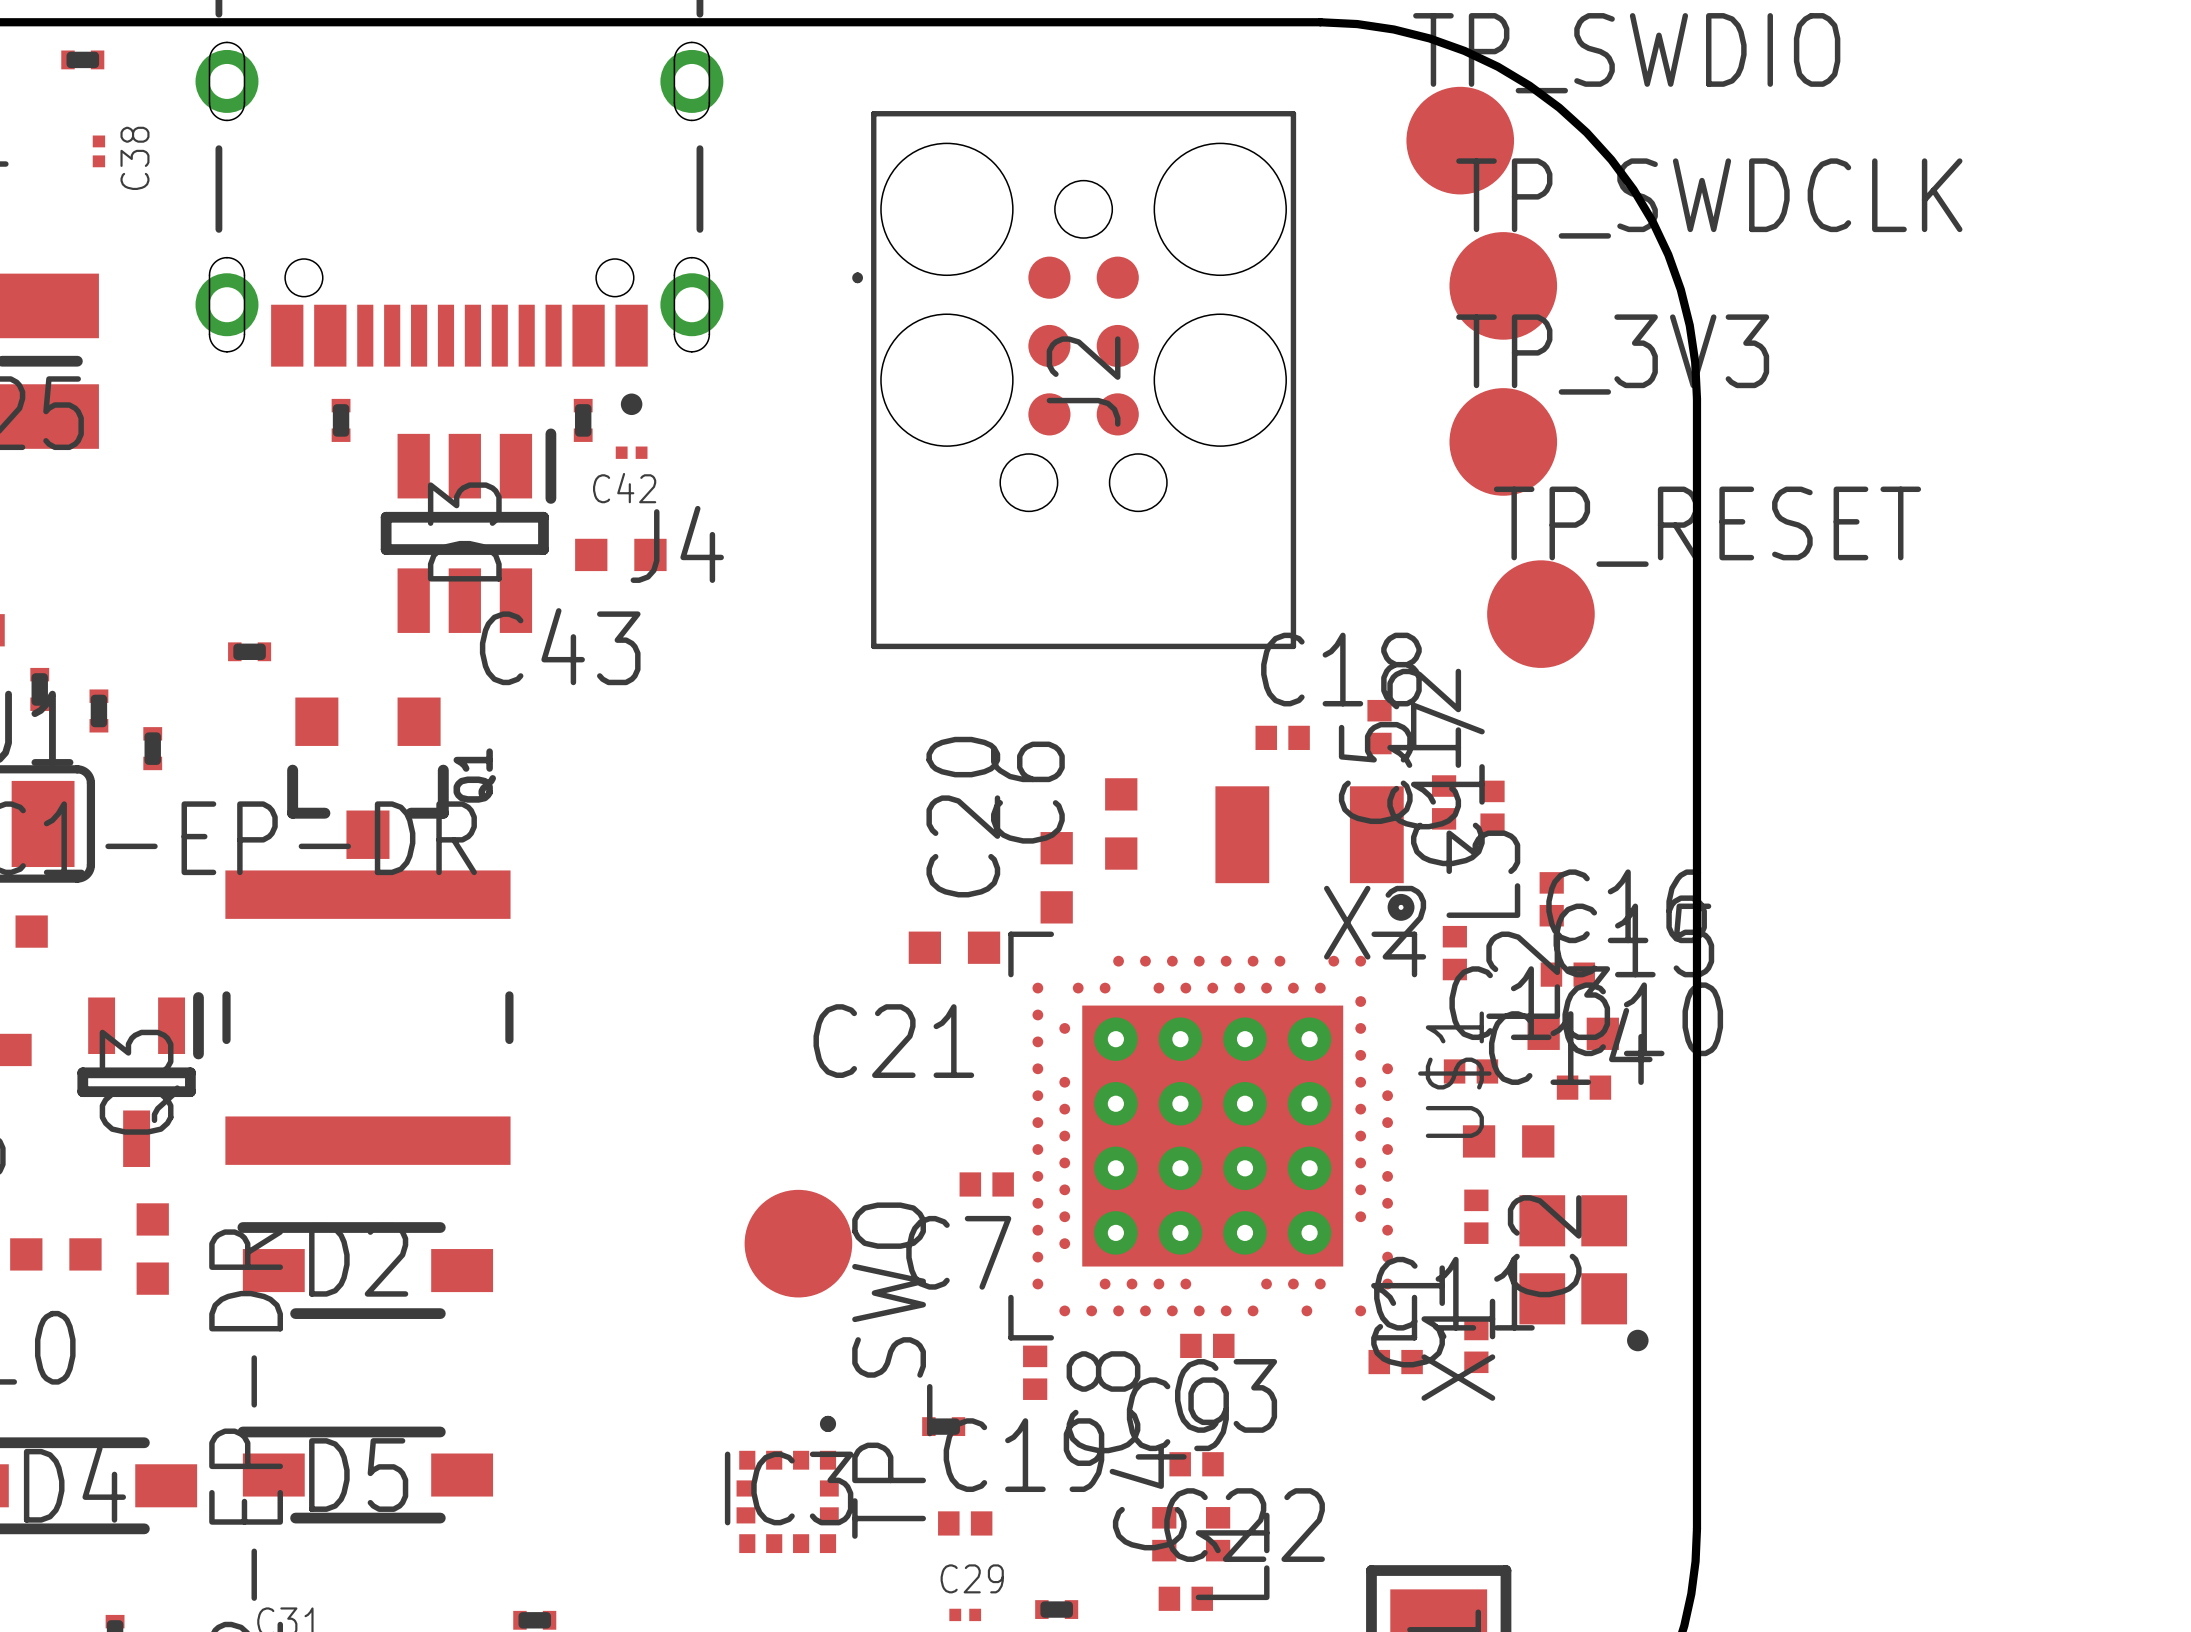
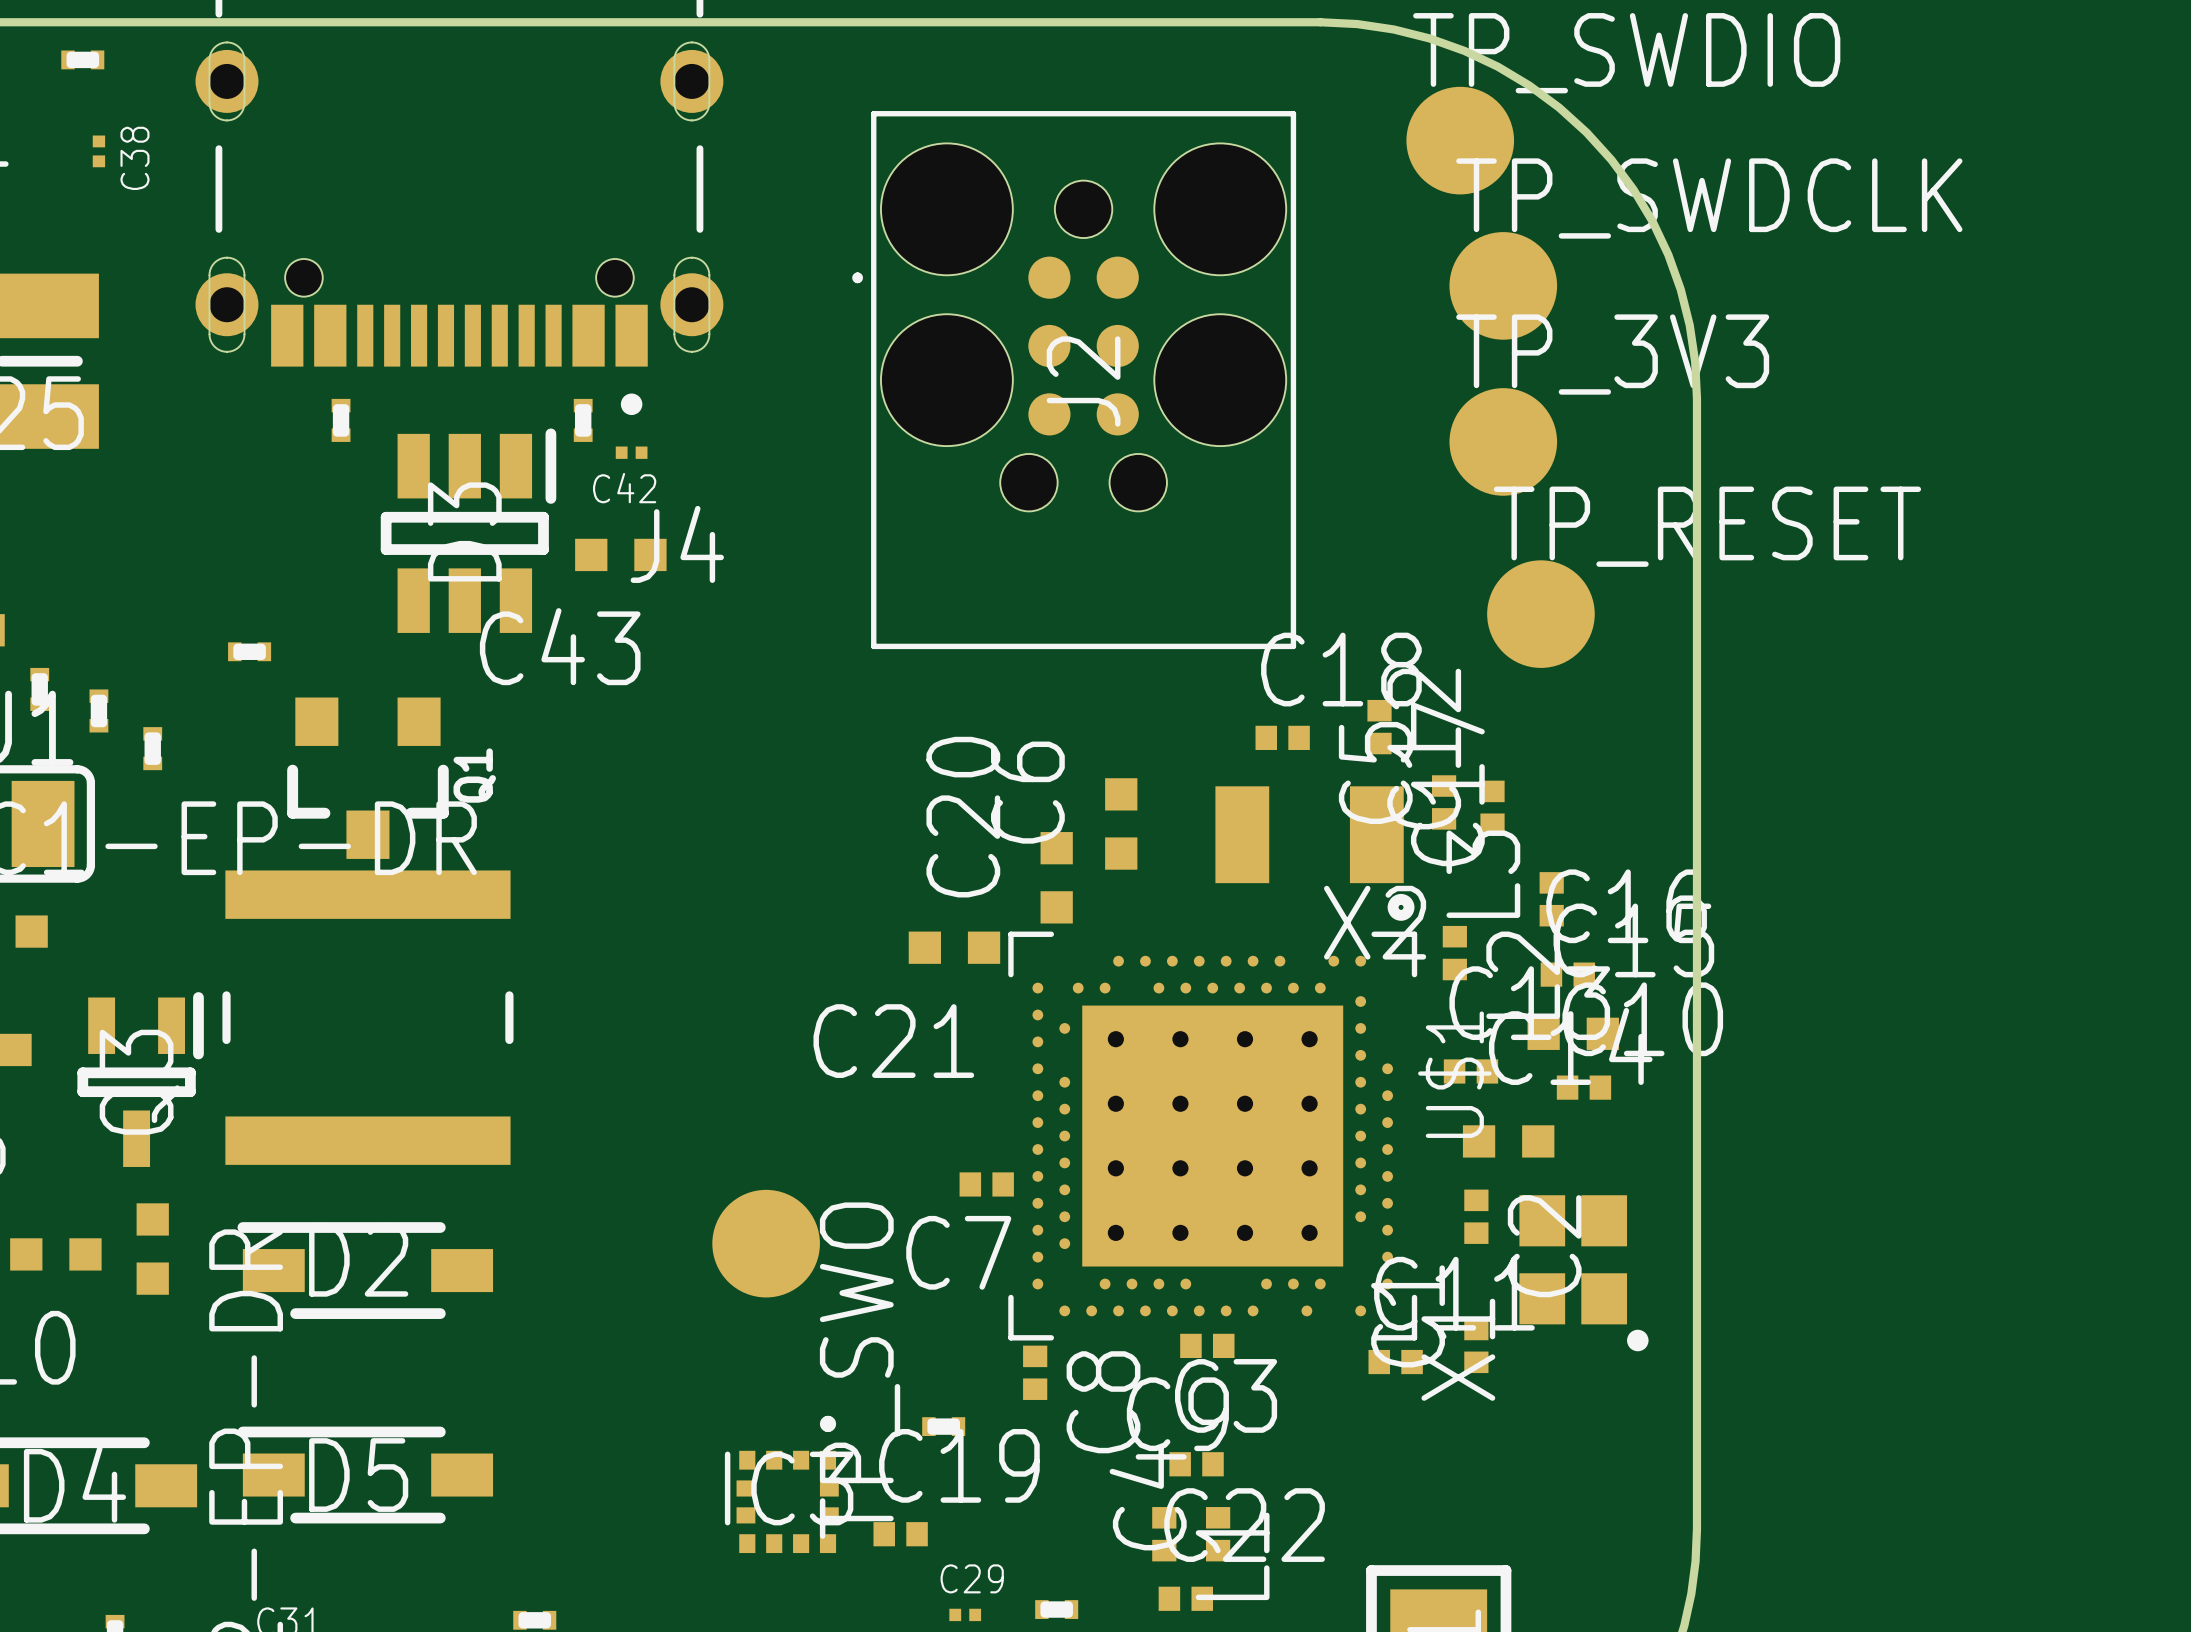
TP_SWO position: (798, 1243) -> (766, 1243)
C19 position: (965, 1523) -> (900, 1534)

